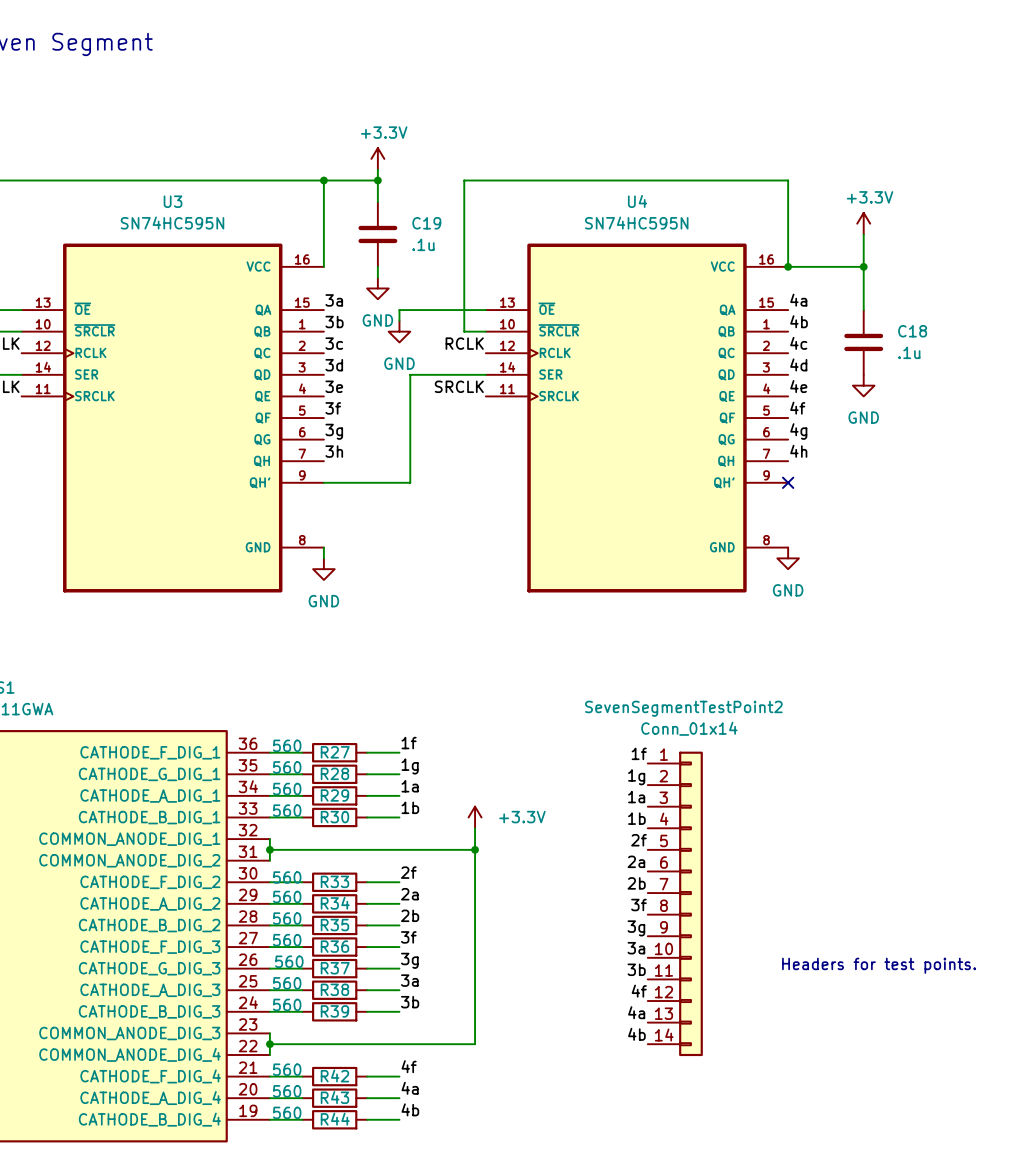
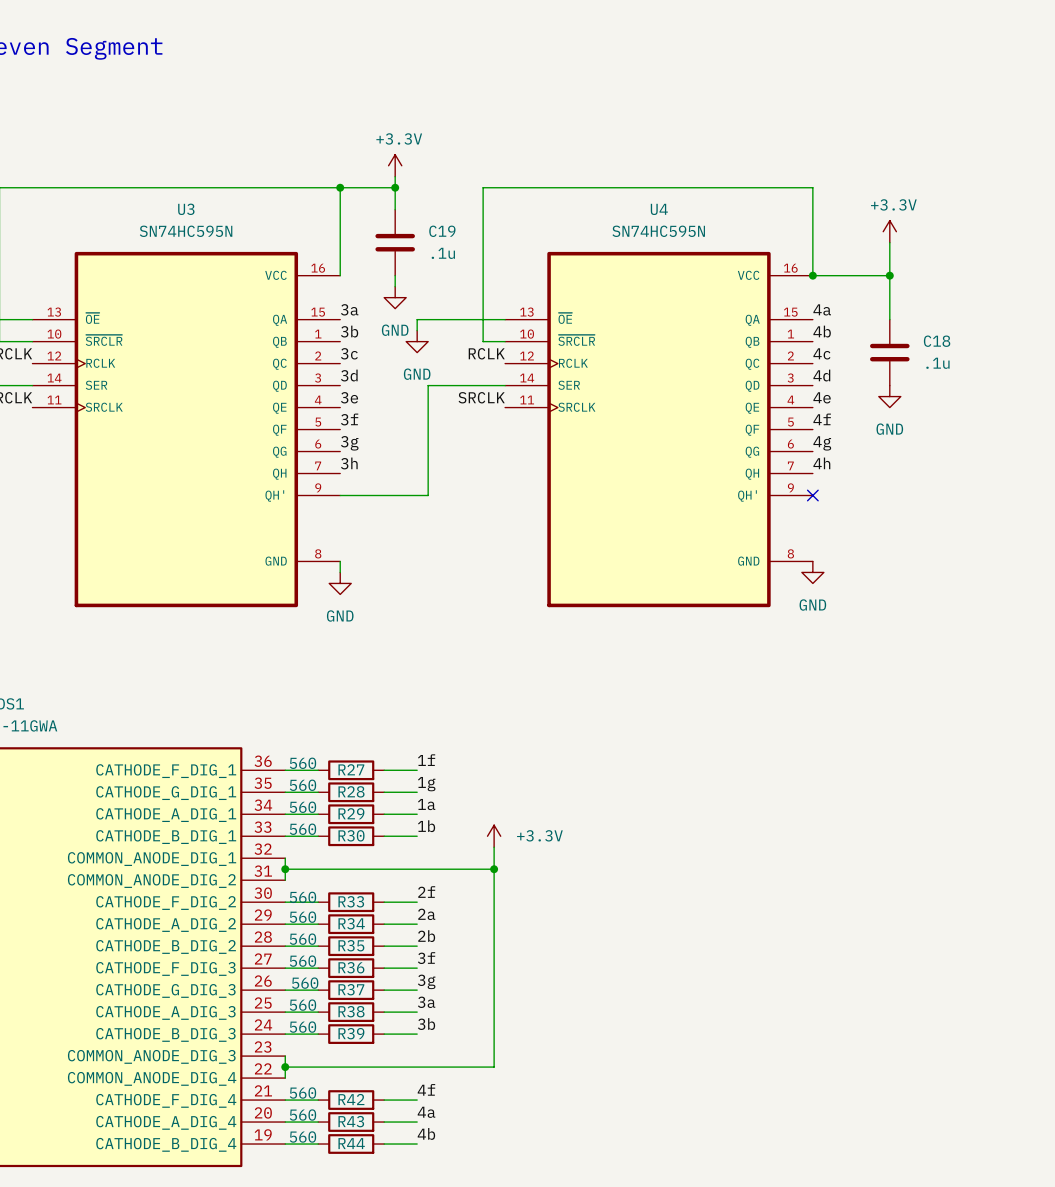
label: 1f (639, 753) -> none
label: 1g (636, 777) -> none
label: 1a (636, 797) -> none
label: 1b (636, 818) -> none
label: 2f (638, 840) -> none
label: 2a (636, 861) -> none
label: 2b (636, 883) -> none
SevenSegmentTestPoint2: Conn_01x14 (675, 903) -> none
label: 3f (638, 905) -> none
label: 3g (636, 928) -> none
label: 3a (636, 948) -> none
text: Headers for test points. (879, 965) -> none
label: 3b (636, 969) -> none
label: 4f (639, 991) -> none
label: 4a (636, 1012) -> none
label: 4b (636, 1034) -> none

